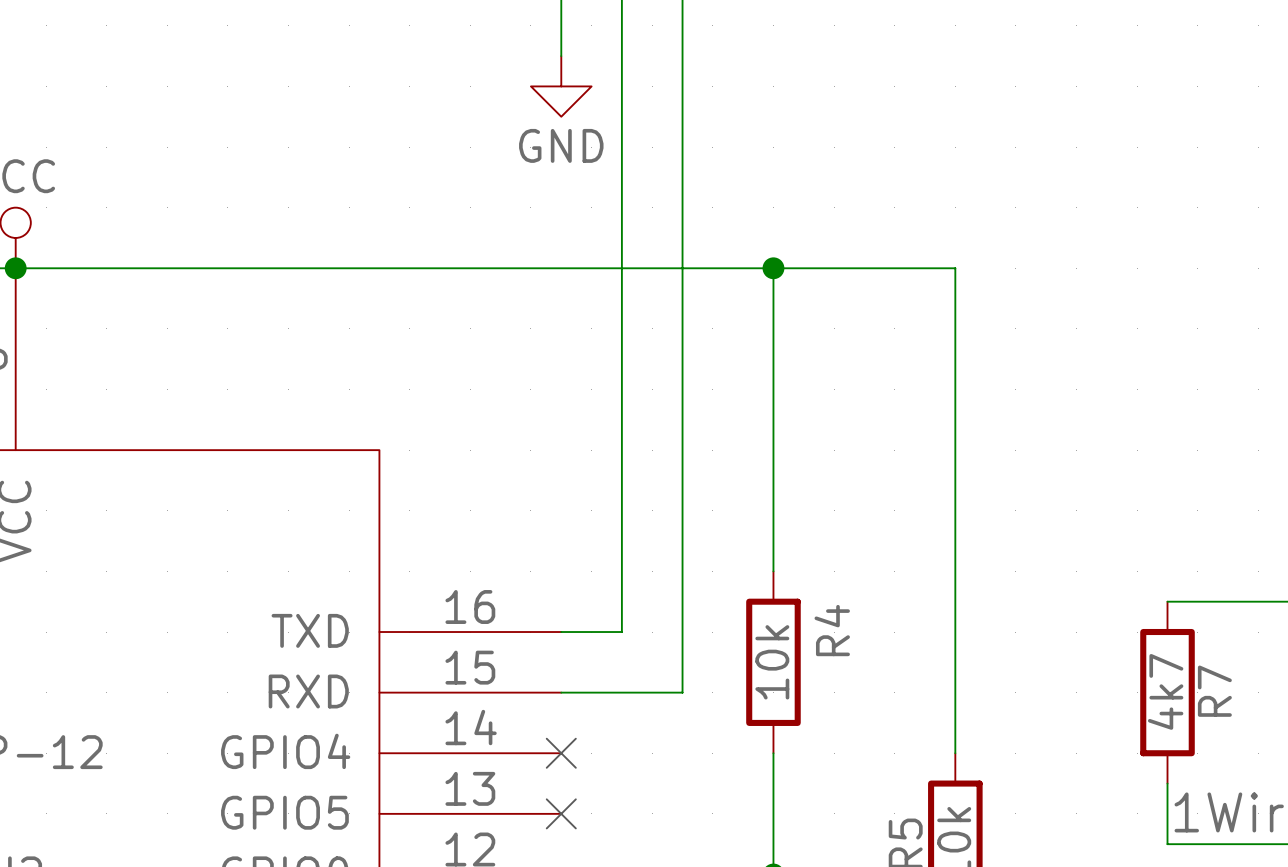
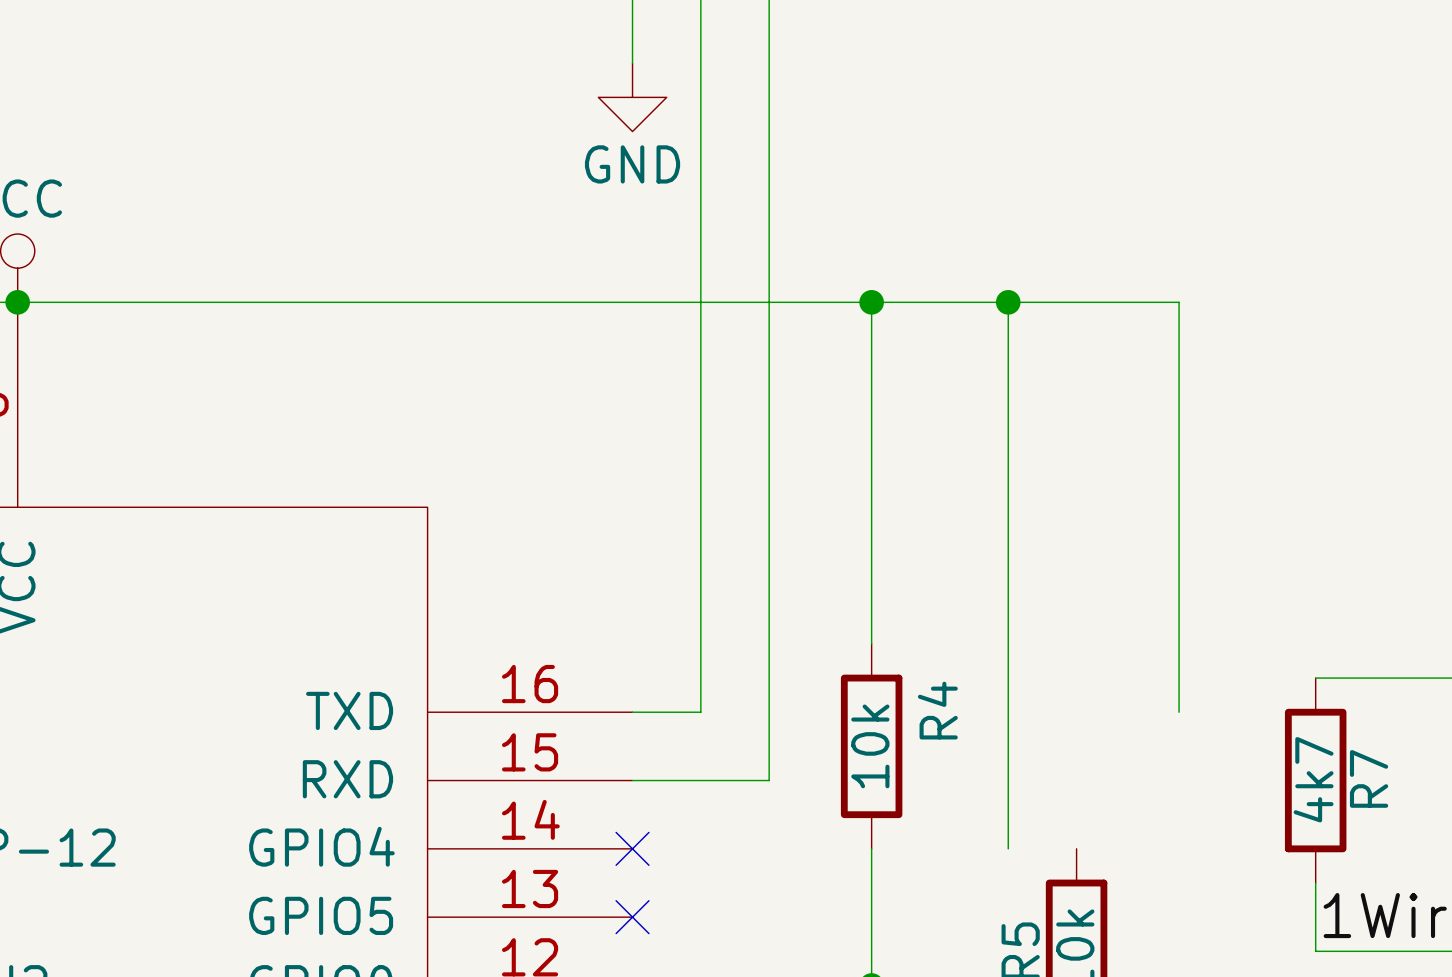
wire: none -> (1008, 302) (1008, 848)
junction: none -> (1008, 302)
wire: (955, 268) (955, 753) -> (1076, 302) (1179, 302) (1179, 712)

